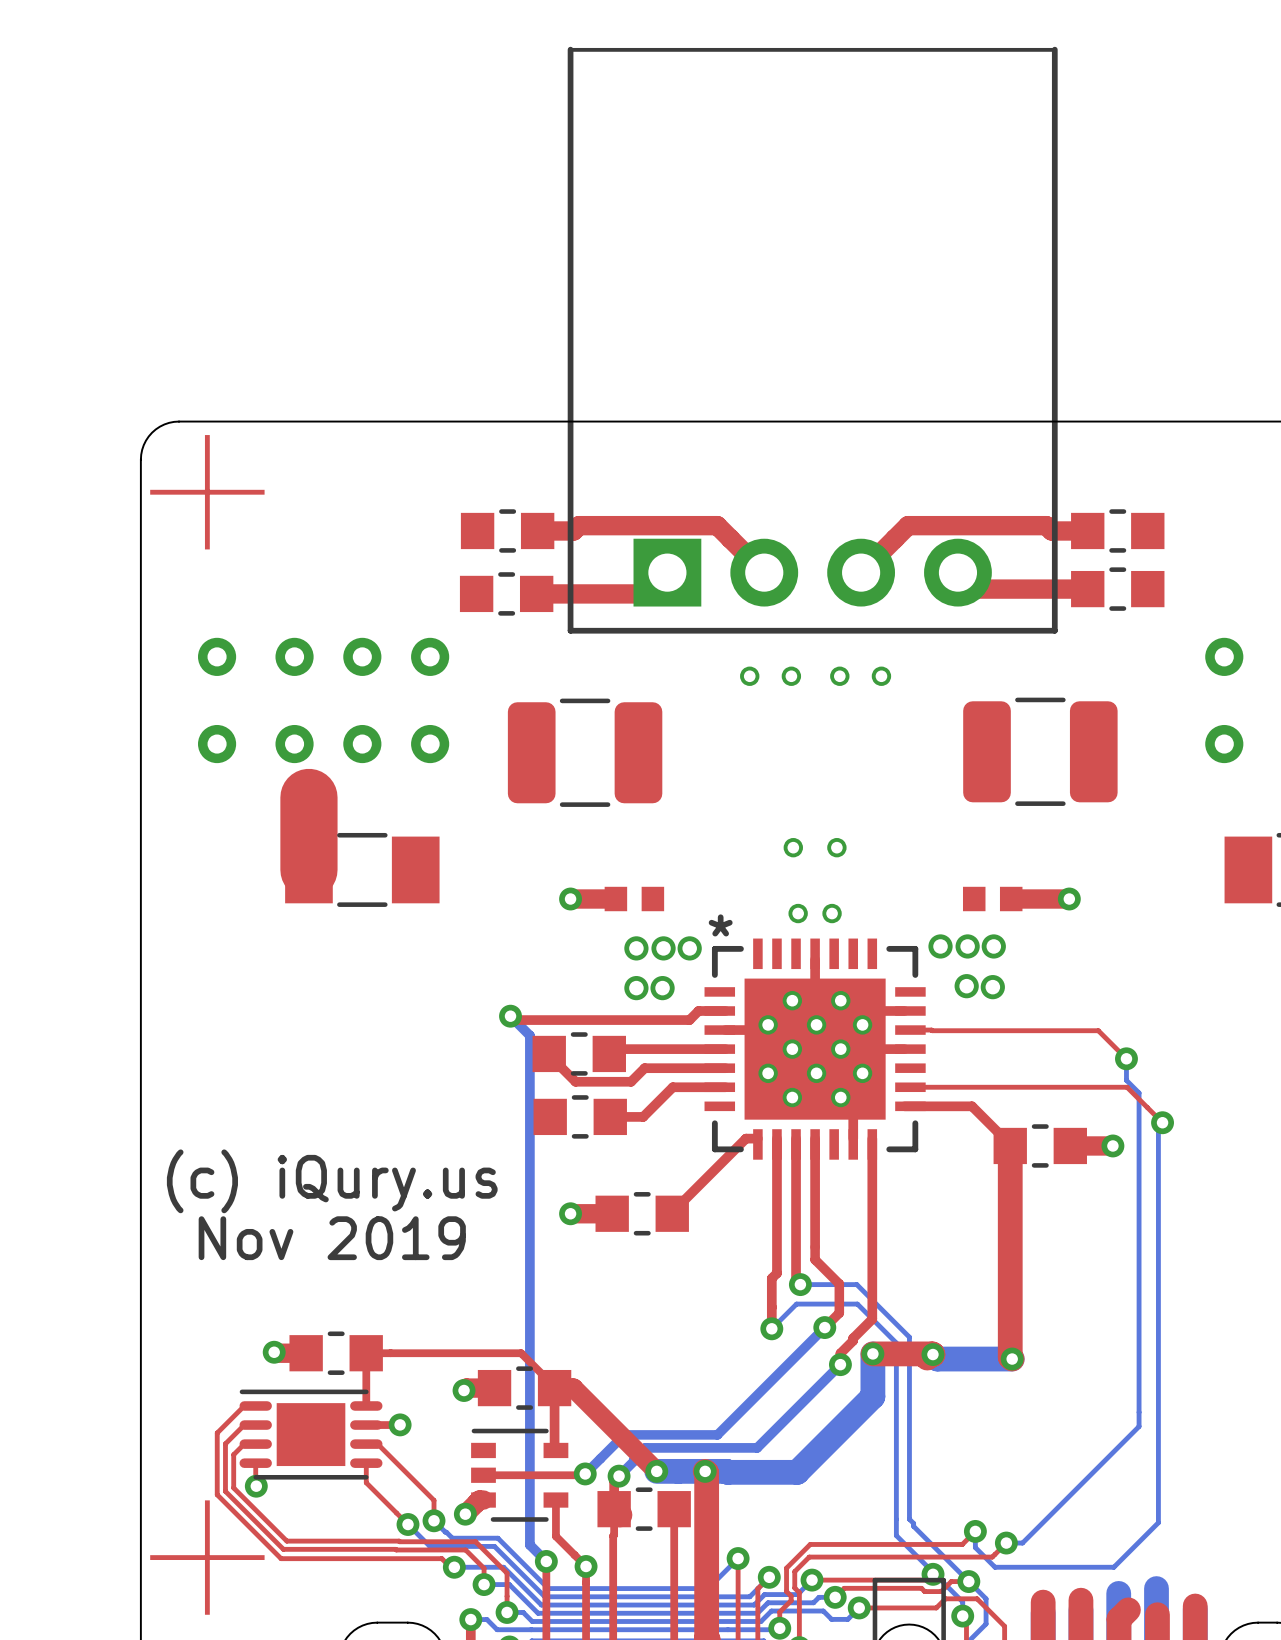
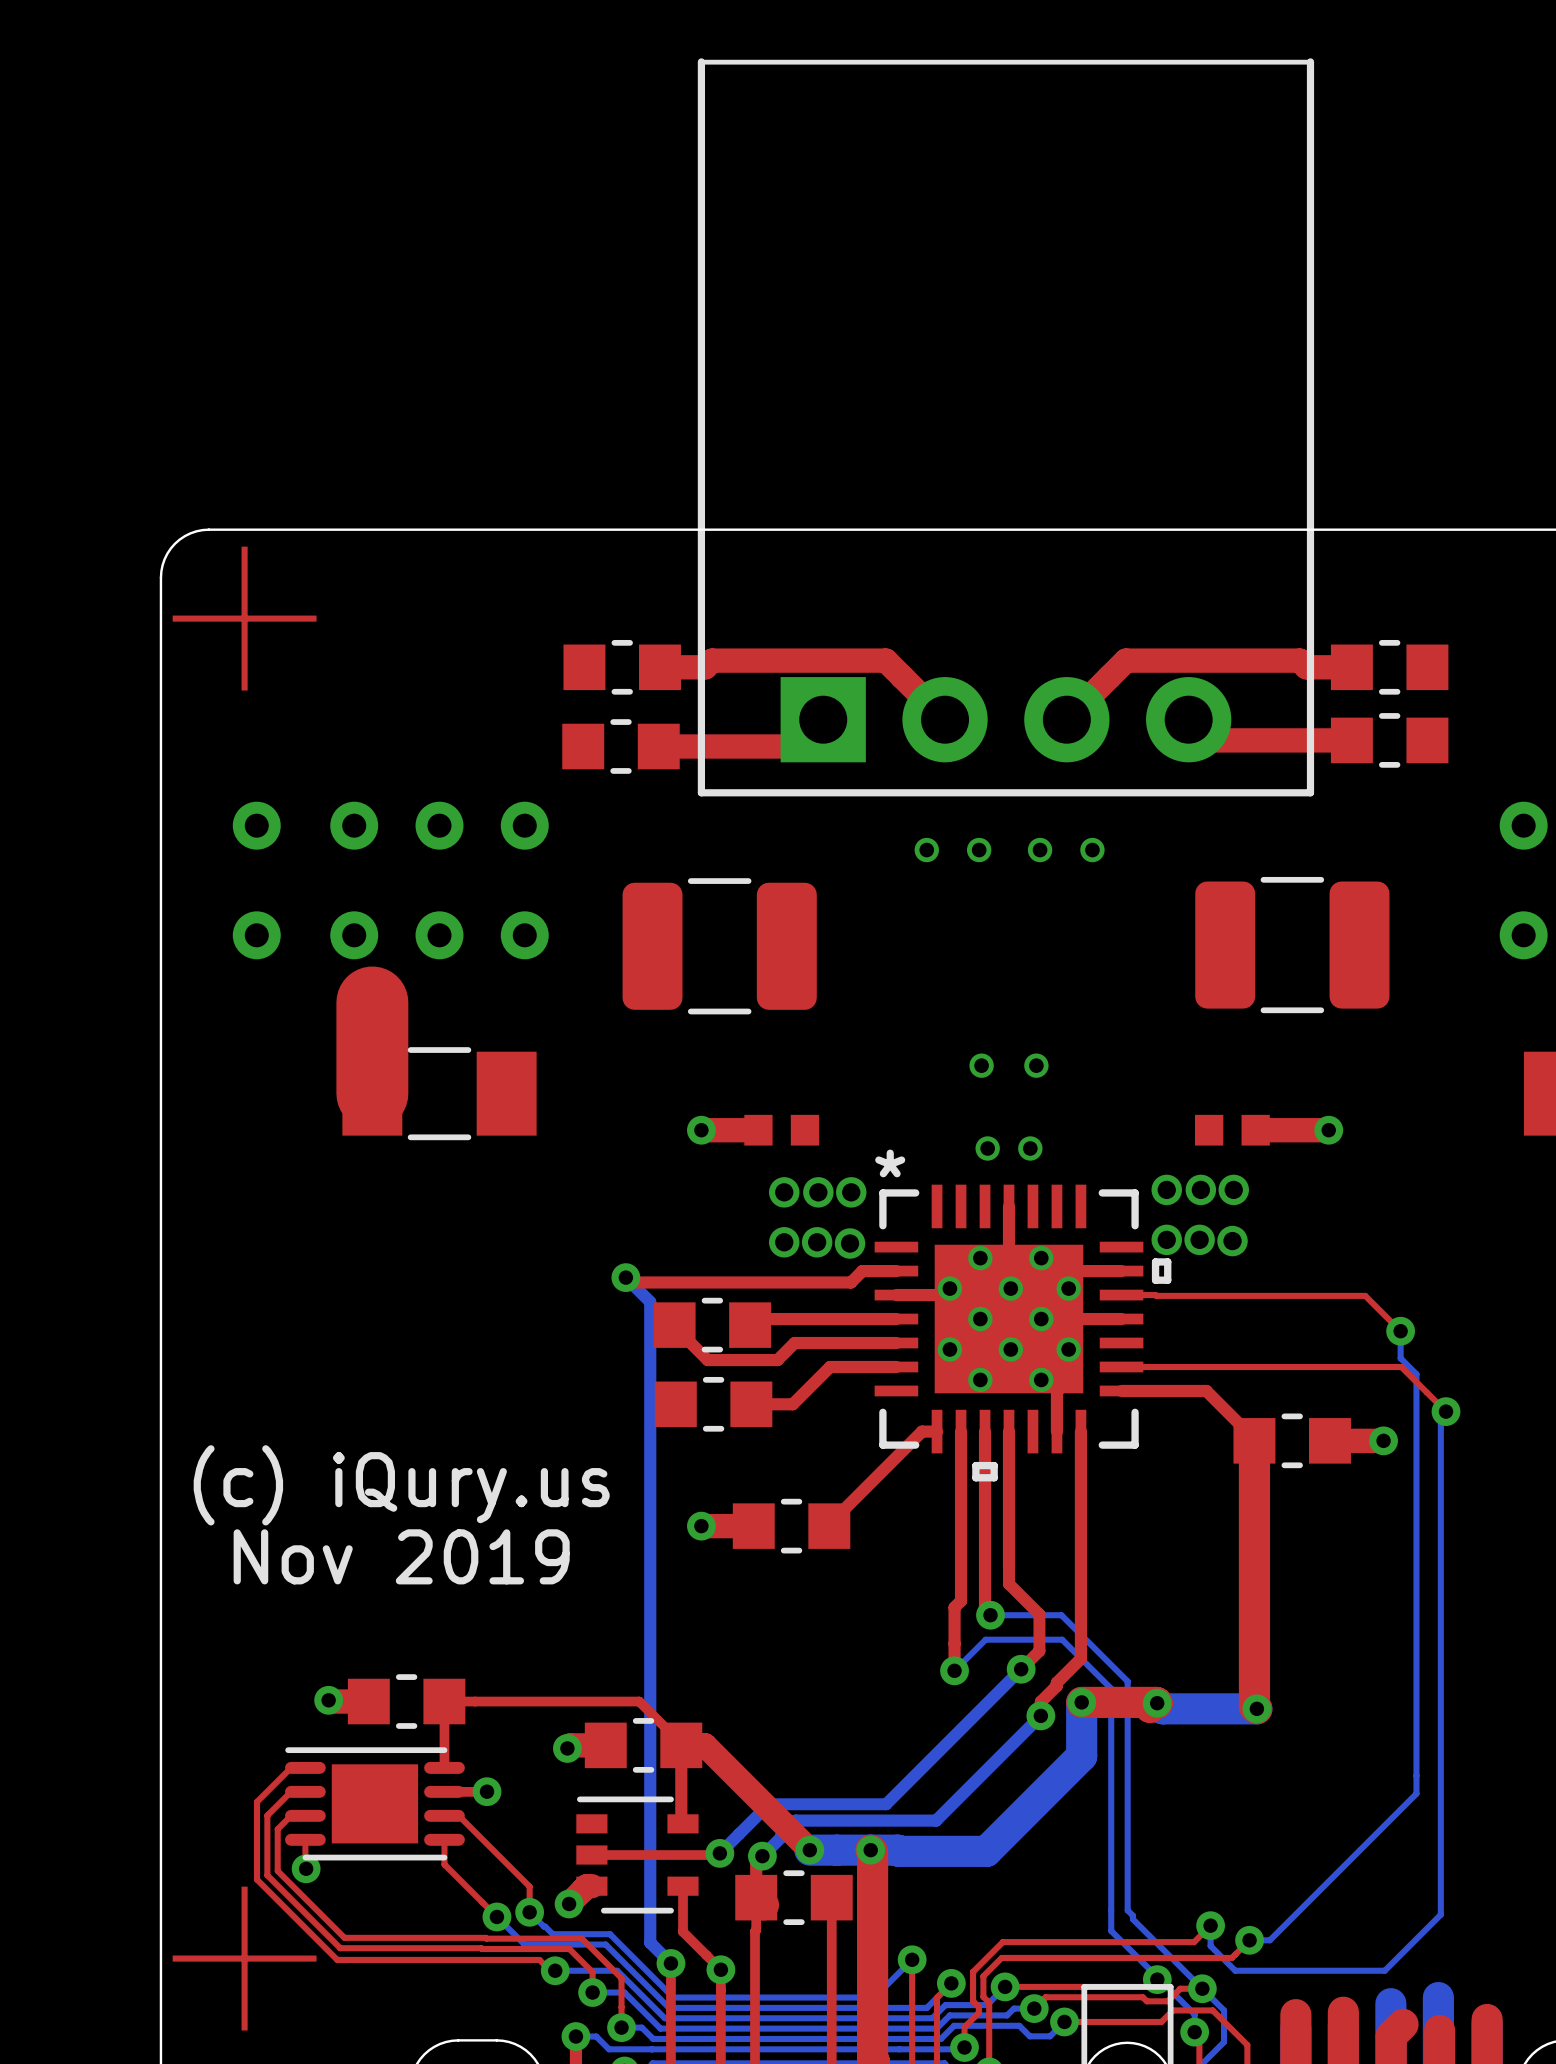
part footprint: [704, 938, 926, 1160] -> [874, 1184, 1172, 1482]
via: none -> (1166, 1239)
via: none -> (850, 1243)

